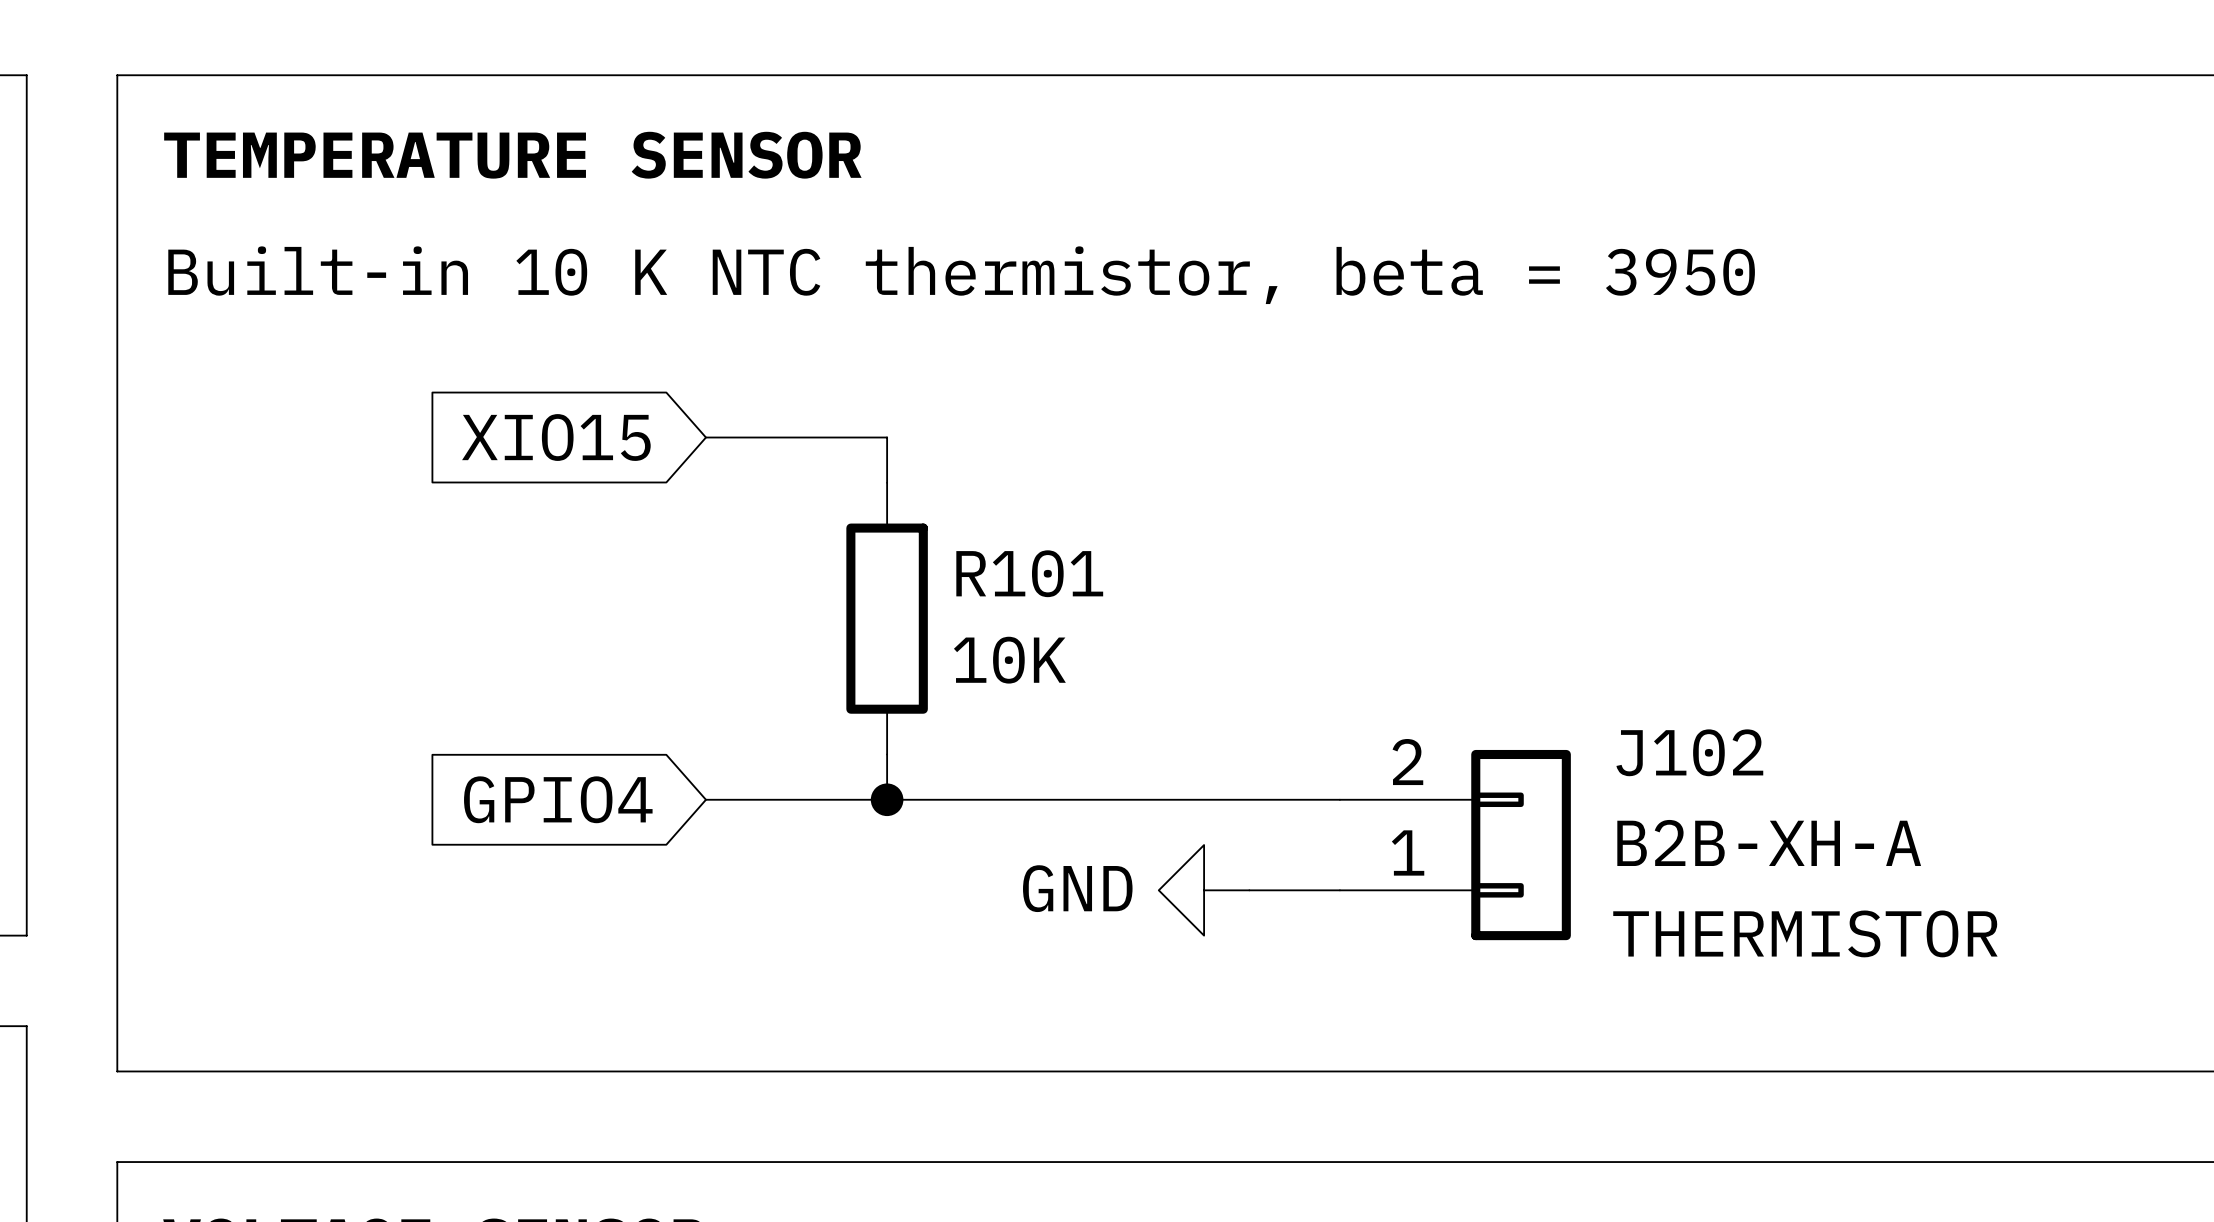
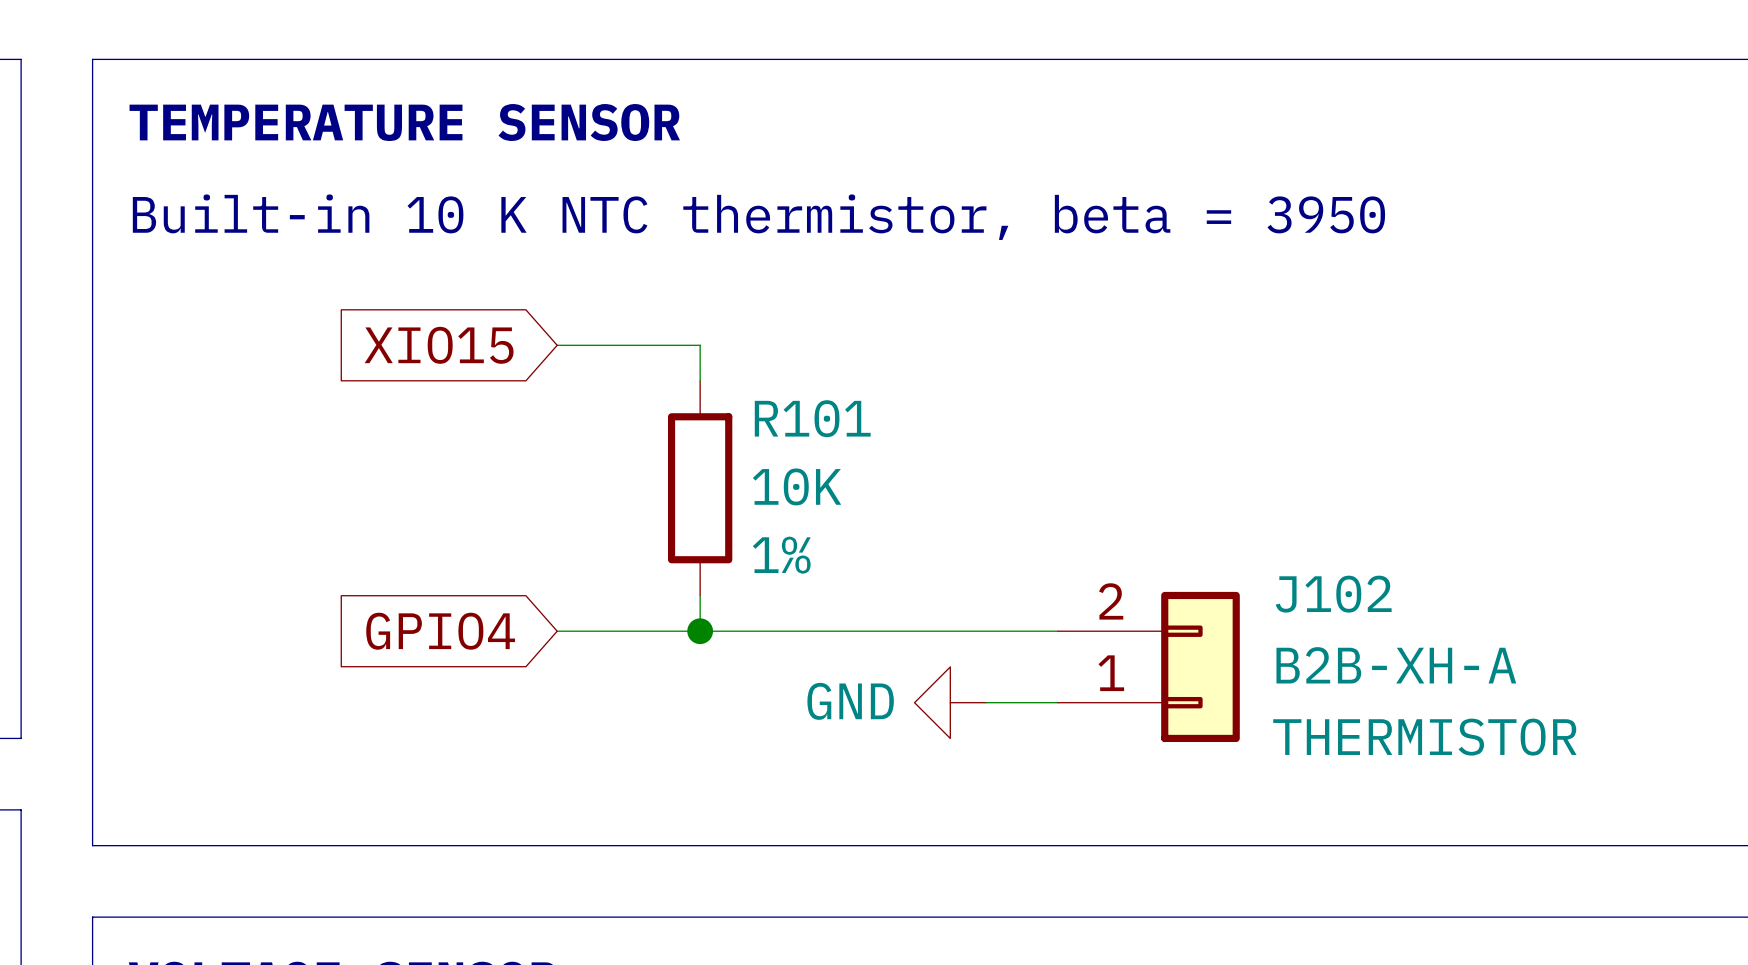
R101 name position: R101 (1029, 573) -> R101 (812, 418)
R101 value position: 10K (1009, 660) -> 10K (797, 486)
R101 text: none -> 1% (781, 555)

